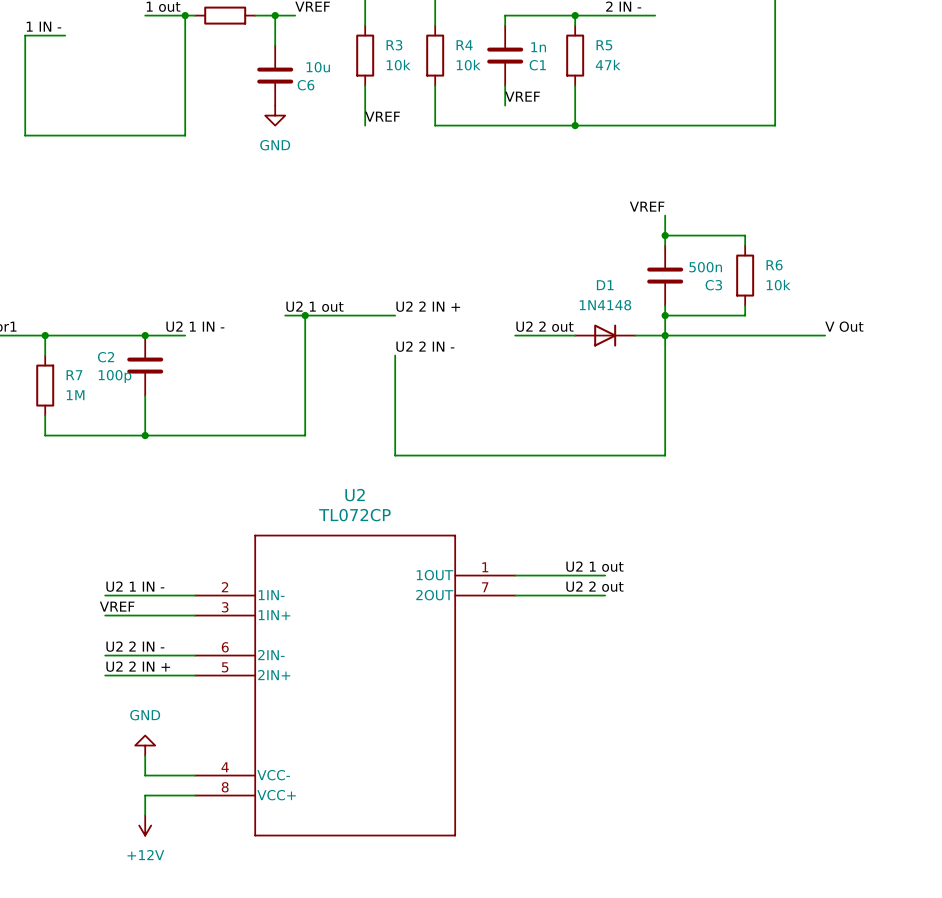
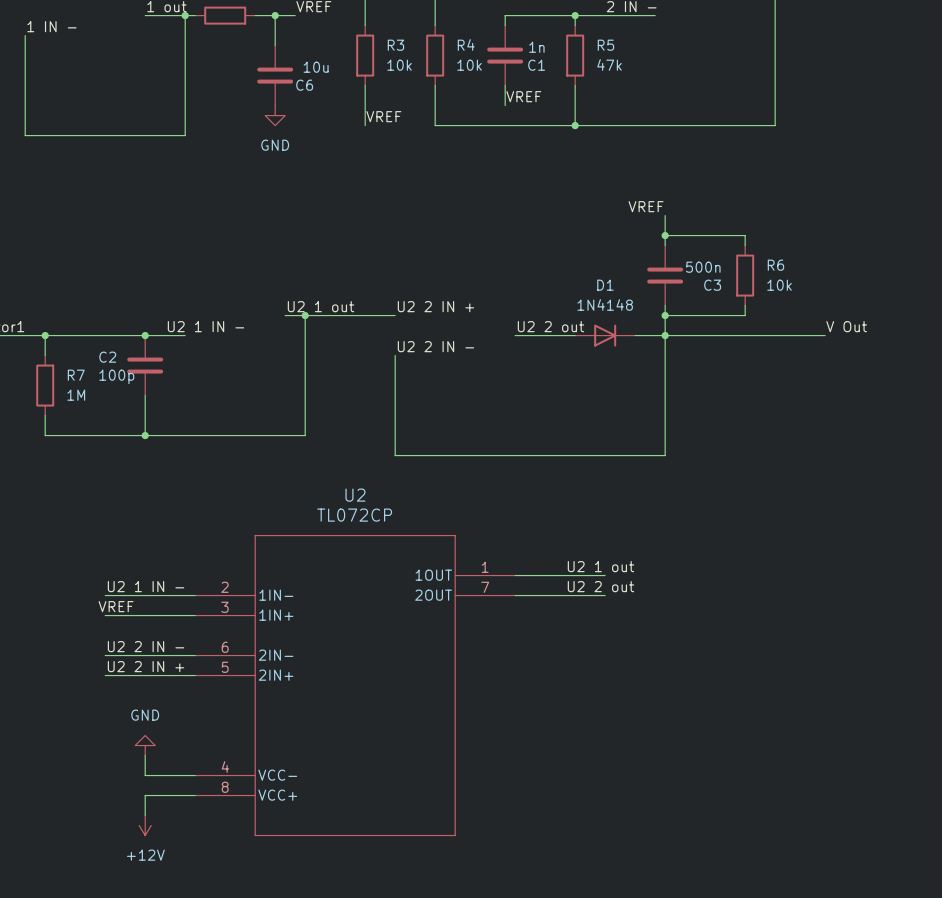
wire: (25, 35) (65, 35) -> none

